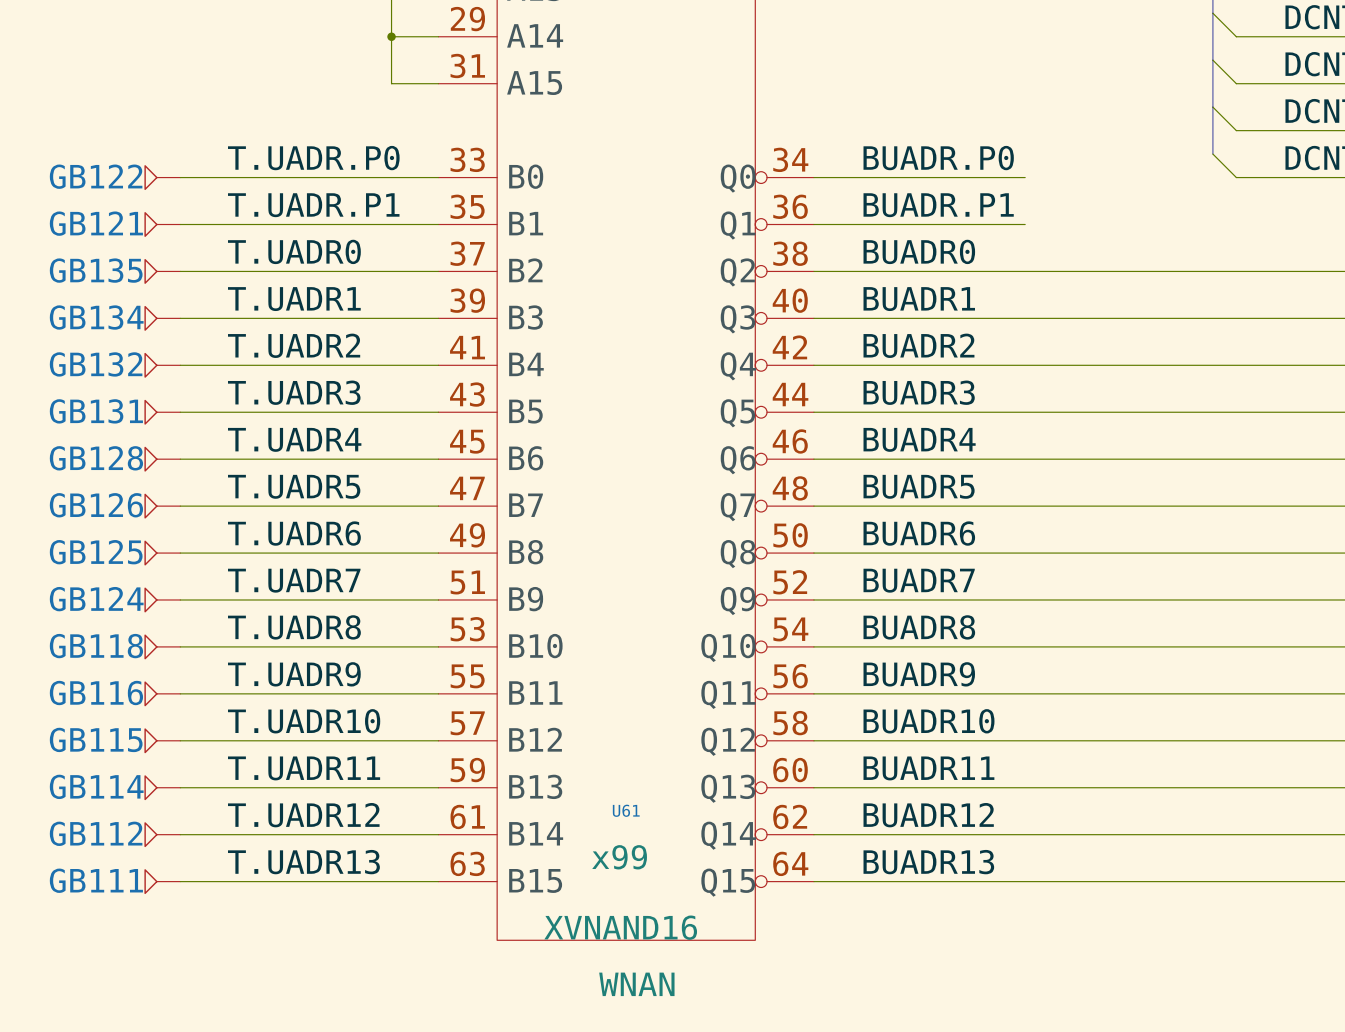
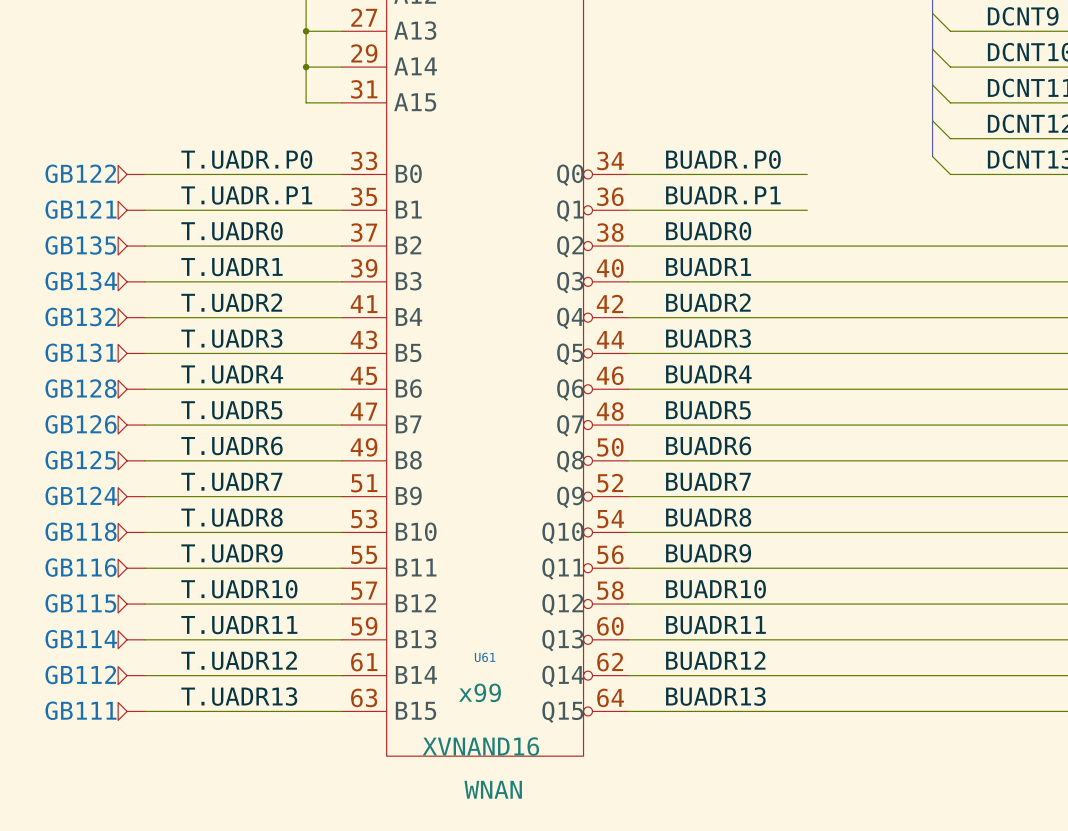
wire: none -> (789, 174) (807, 174)
wire: none -> (789, 210) (807, 210)

